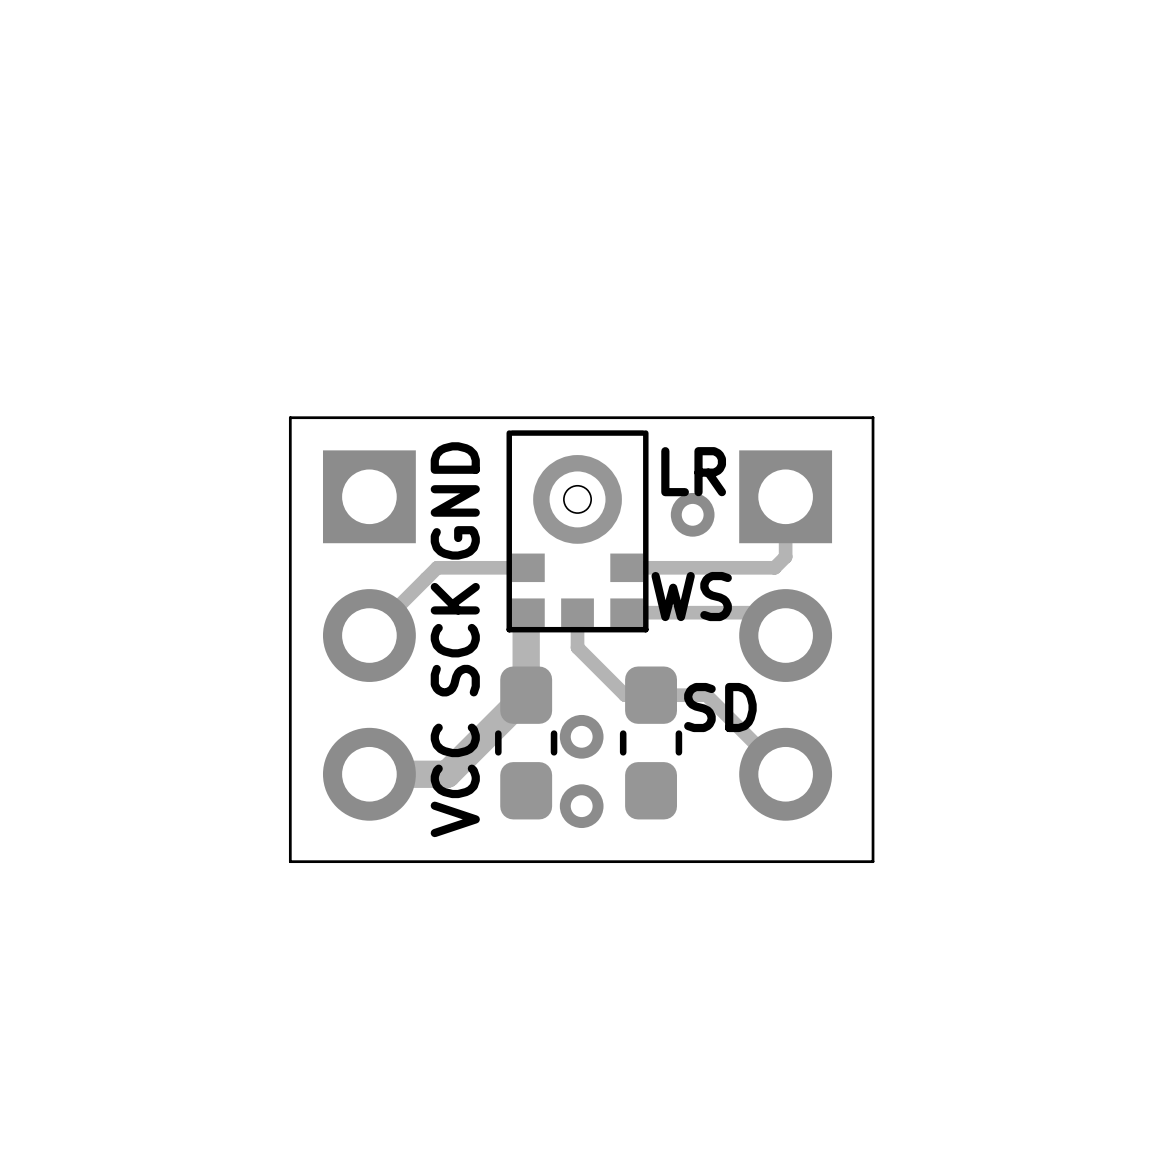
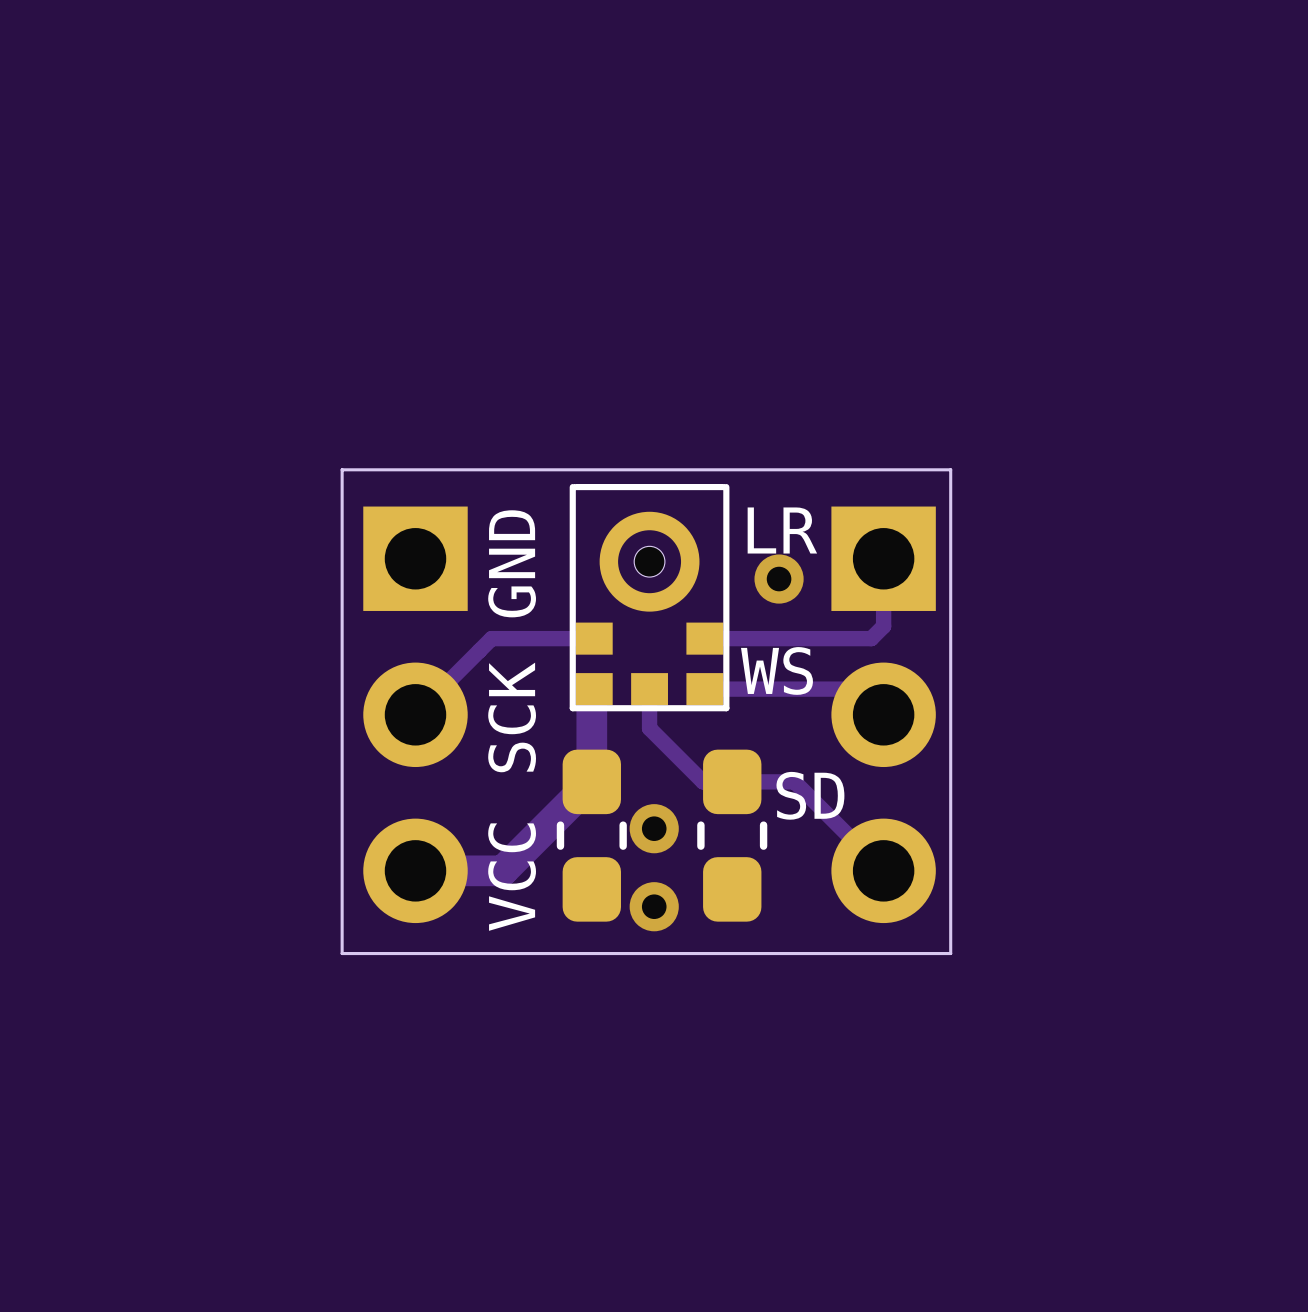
board edge: (304, 417) (290, 417) (290, 861) (873, 861) (873, 417) (845, 417) -> (342, 469) (342, 953) (950, 953) (950, 469)

